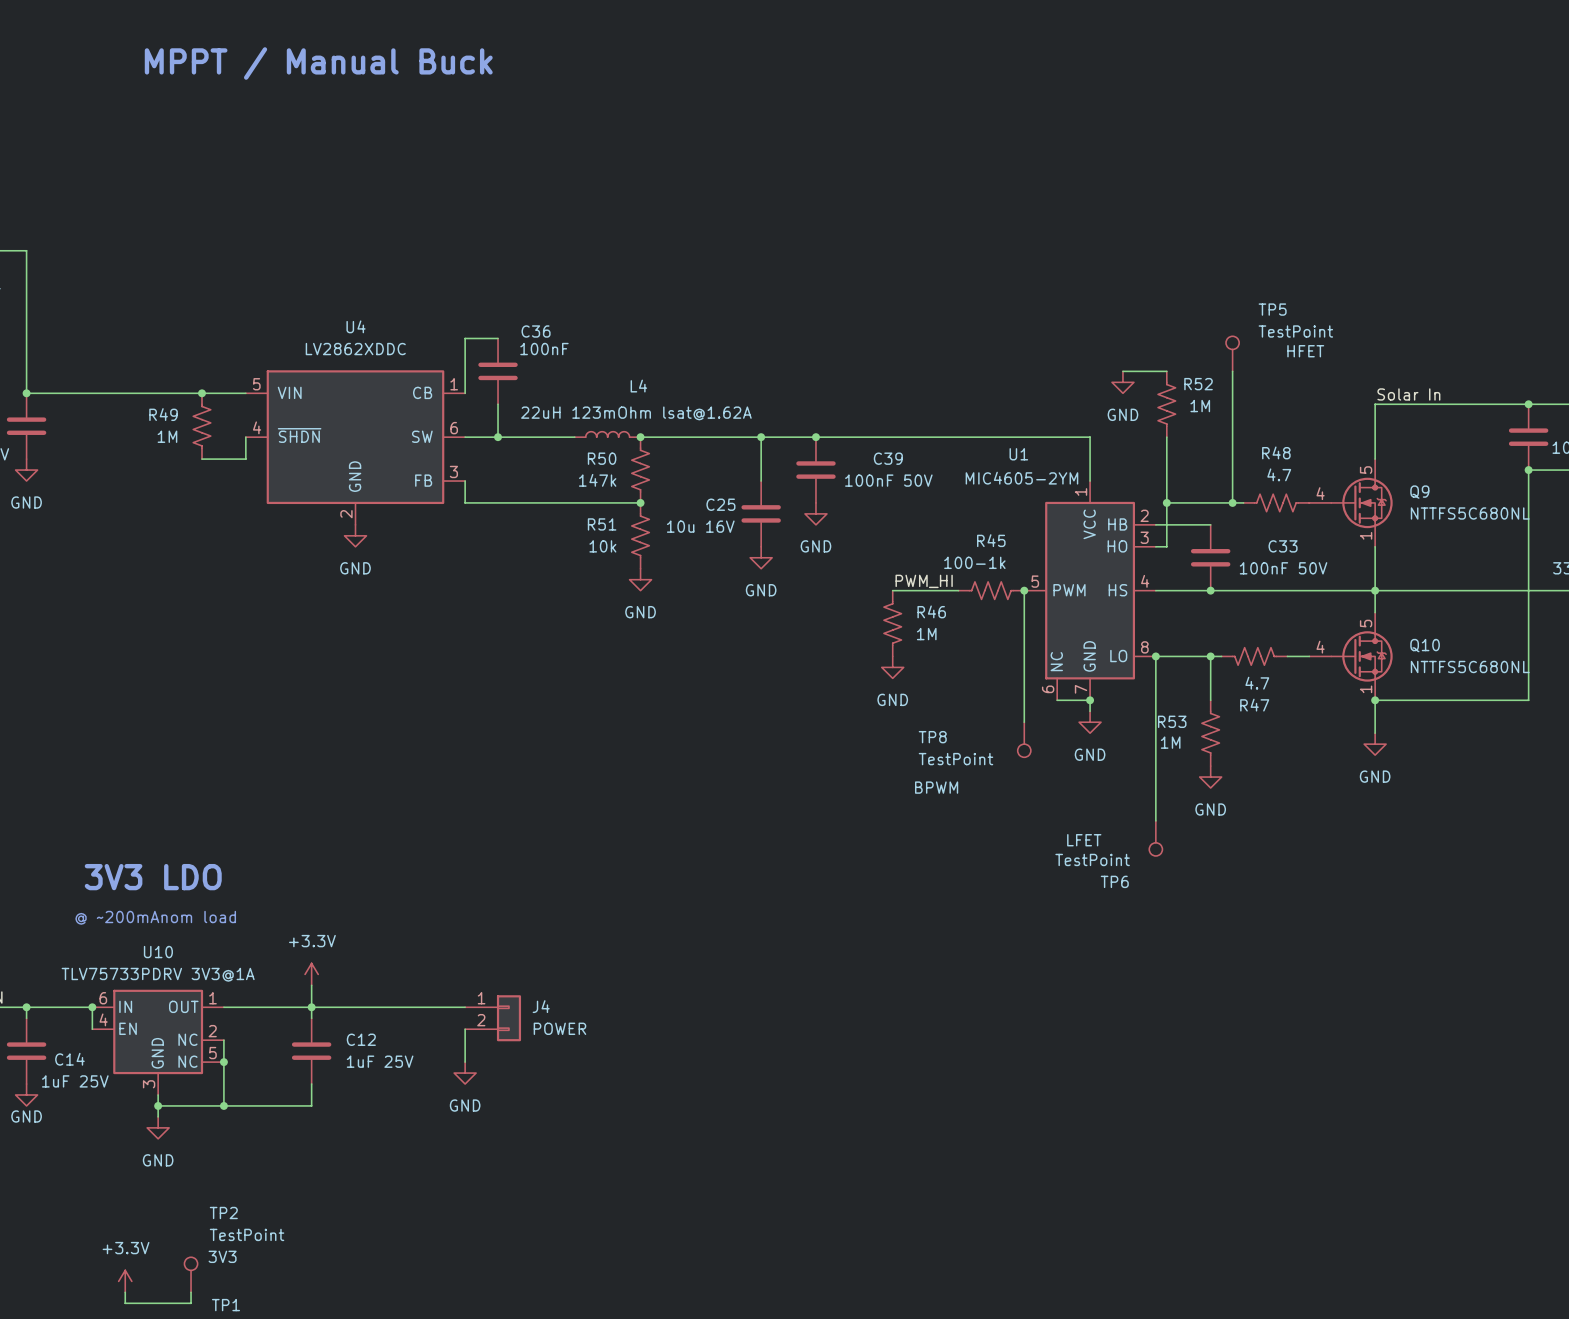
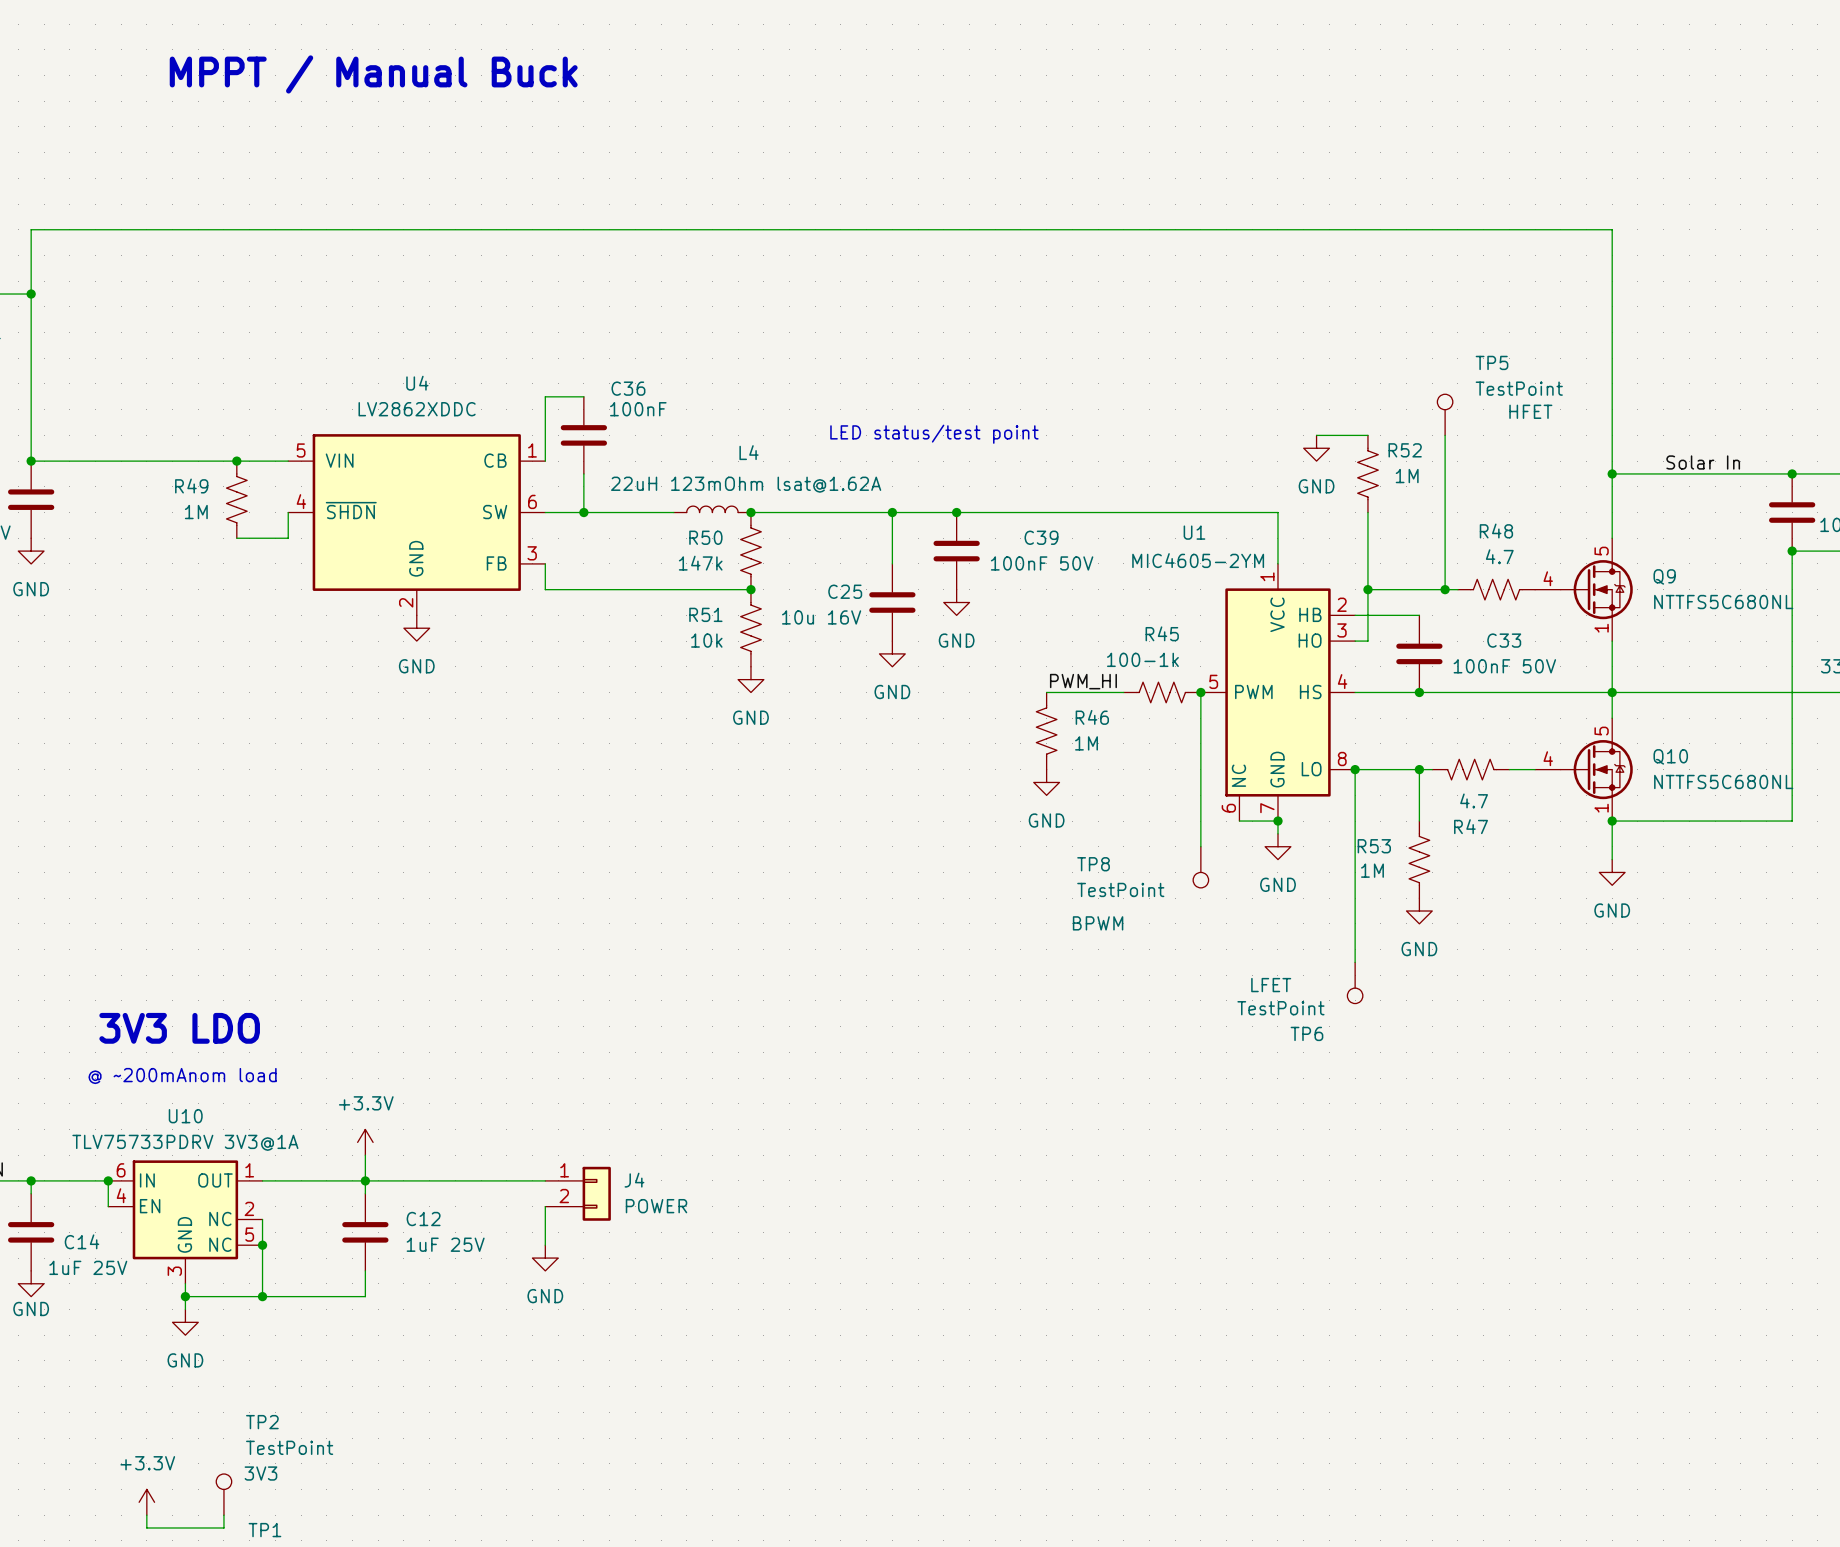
wire: none -> (31, 294) (31, 229) (1612, 229) (1612, 473)
junction: none -> (31, 294)
text: none -> LED status/test point (934, 434)
label position: Solar In (1408, 394) -> Solar In (1703, 462)
junction: none -> (1612, 473)

